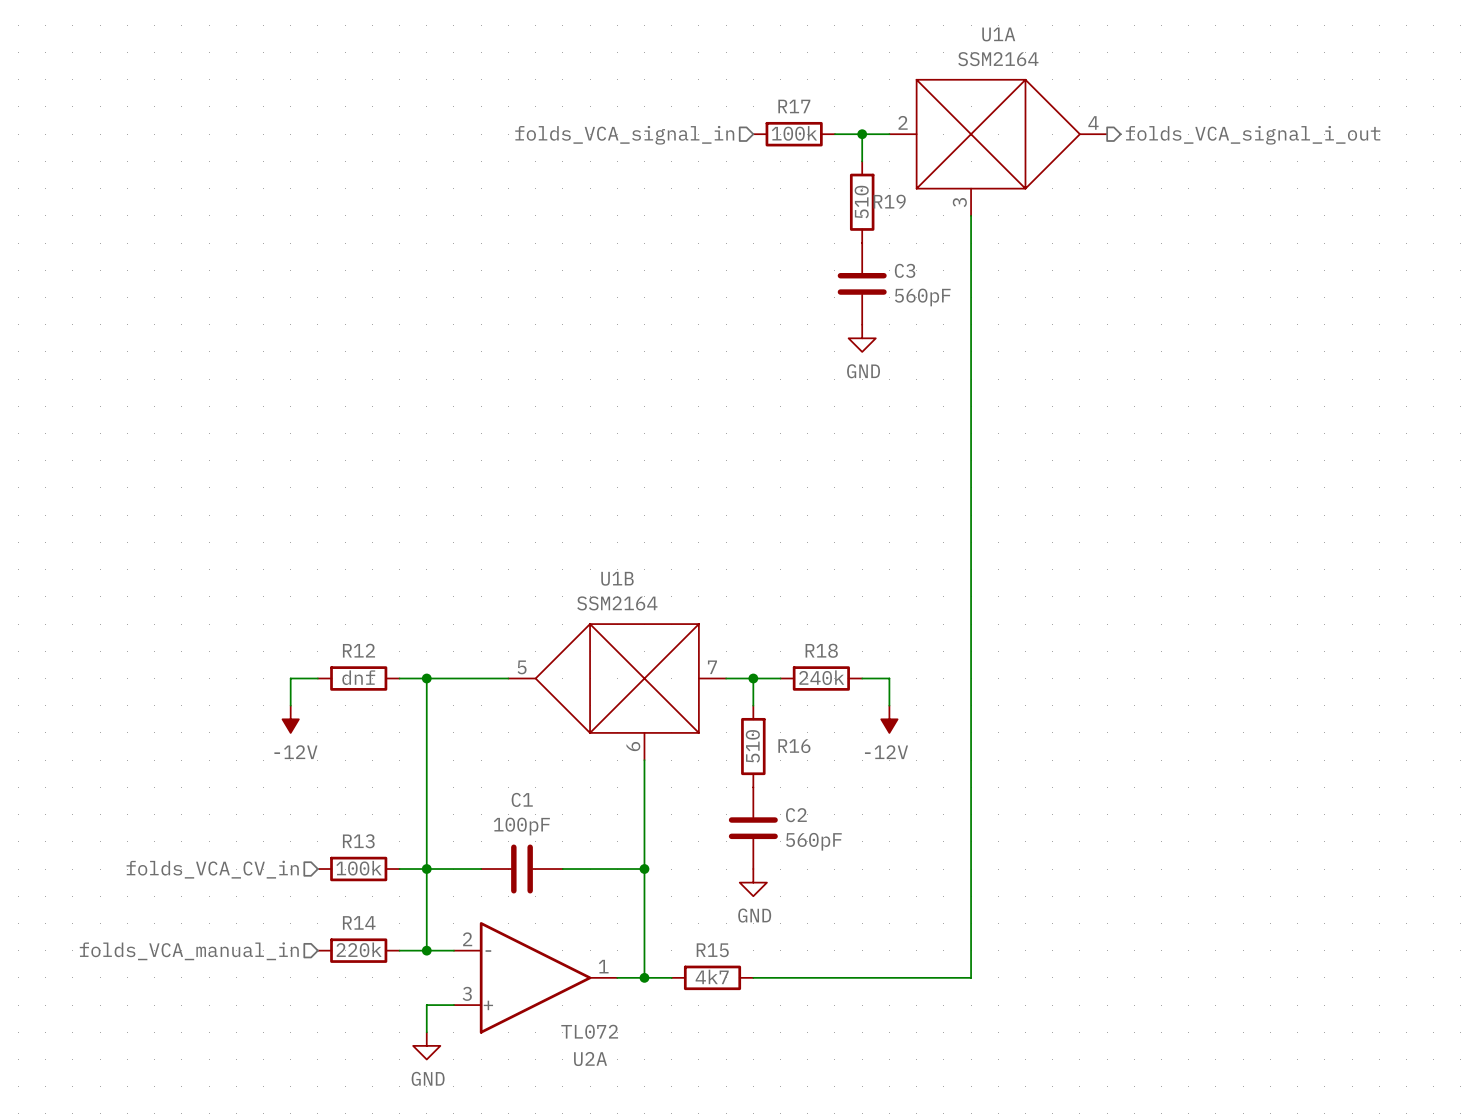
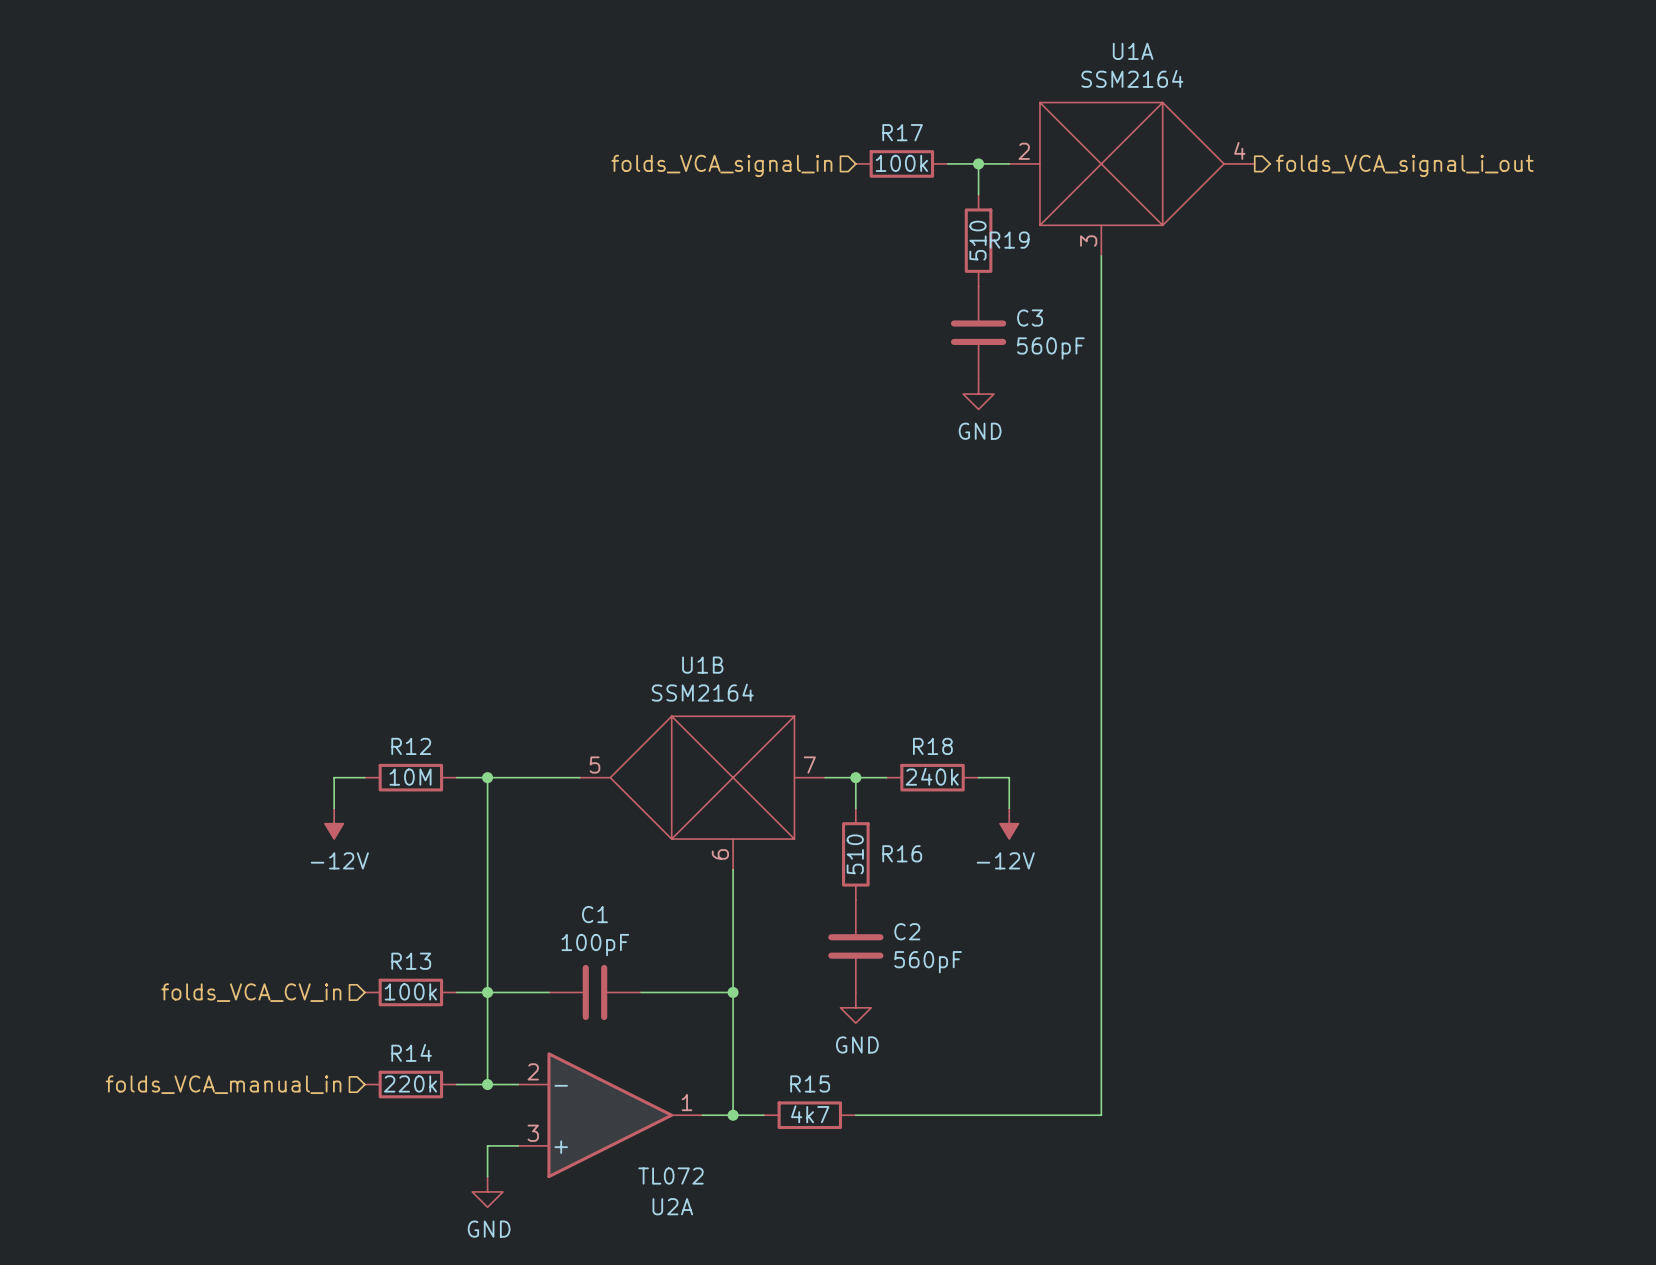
R12 value: dnf (358, 677) -> 10M (410, 777)

